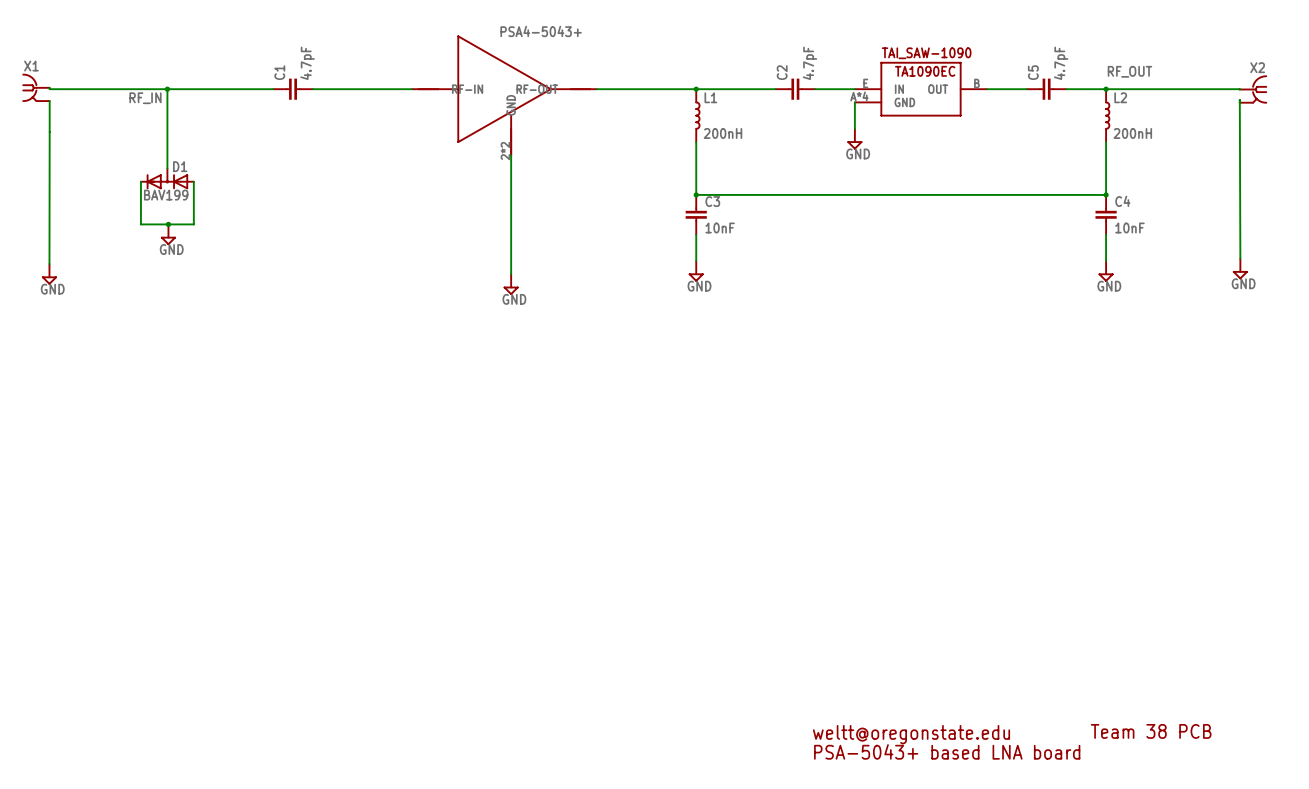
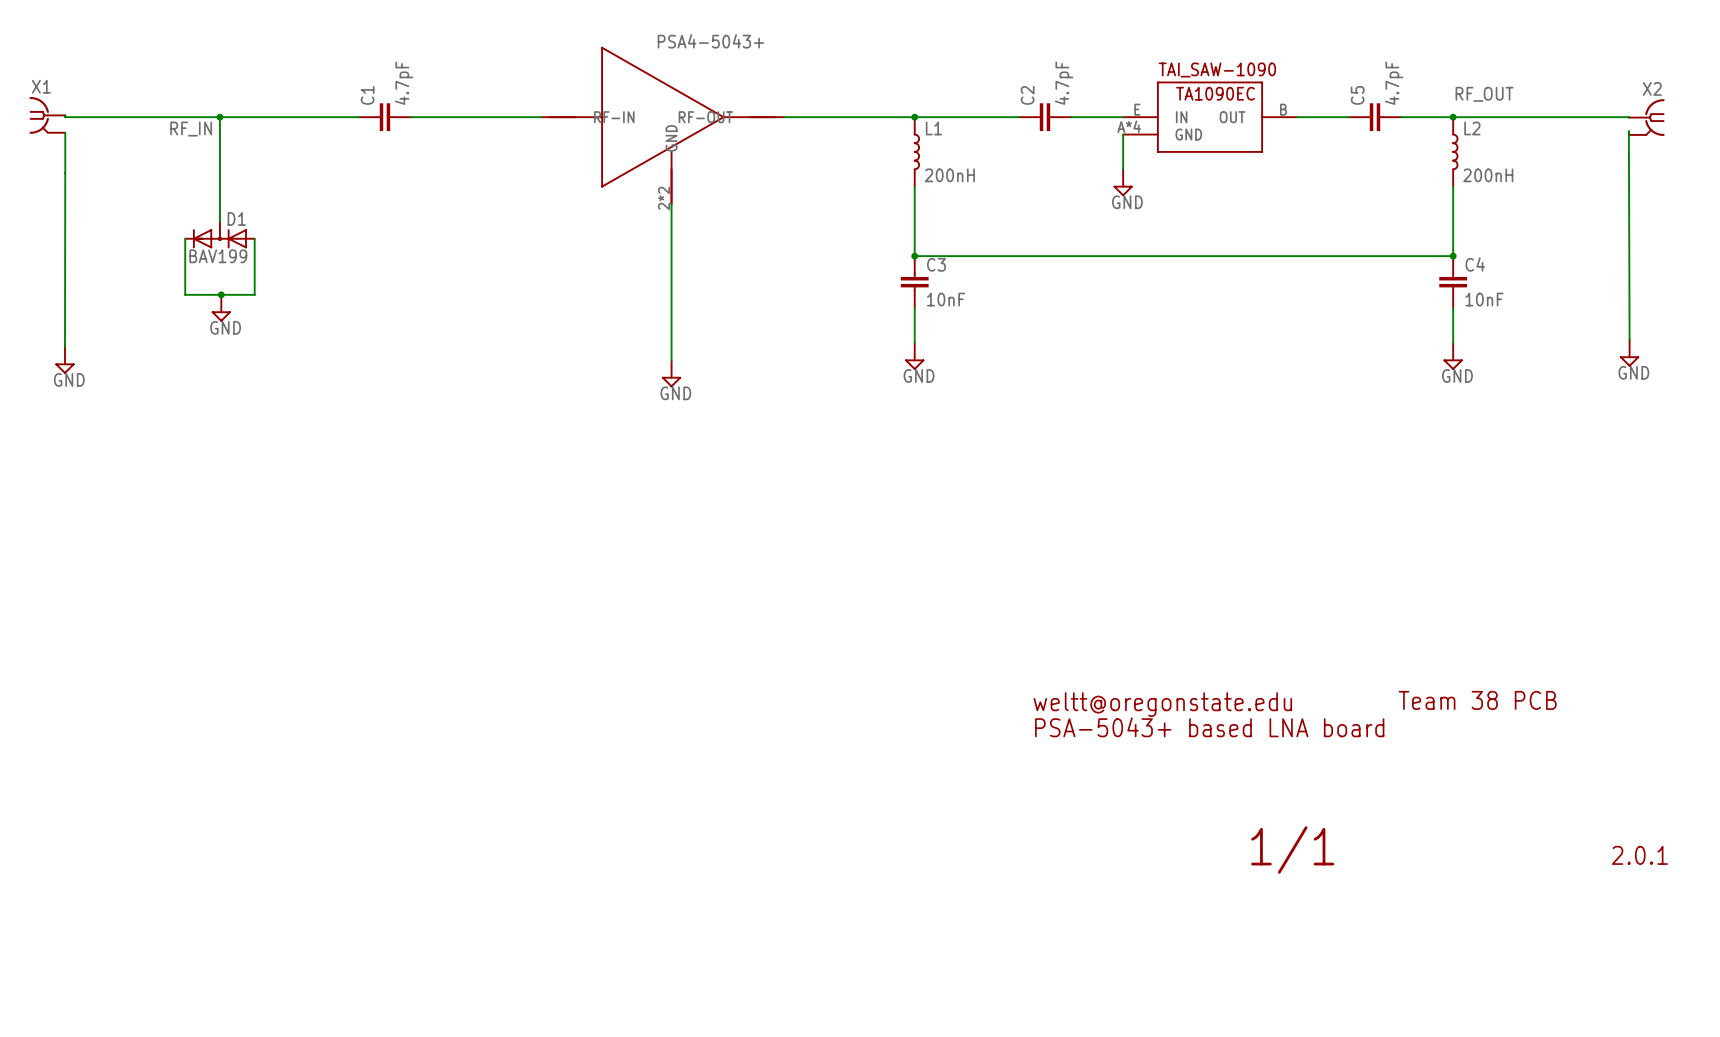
text: none -> Team 38 PCB (1477, 700)
text: none -> weltt@oregonstate.edu (1162, 704)
text: none -> PSA-5043+ based LNA board (1209, 727)
text: none -> 1/1 (1292, 849)
text: none -> 2.0.1 (1639, 855)
text: Team 38 PCB (1151, 731) -> none
text: weltt@oregonstate.edu (911, 734) -> none
text: PSA-5043+ based LNA board (947, 751) -> none

